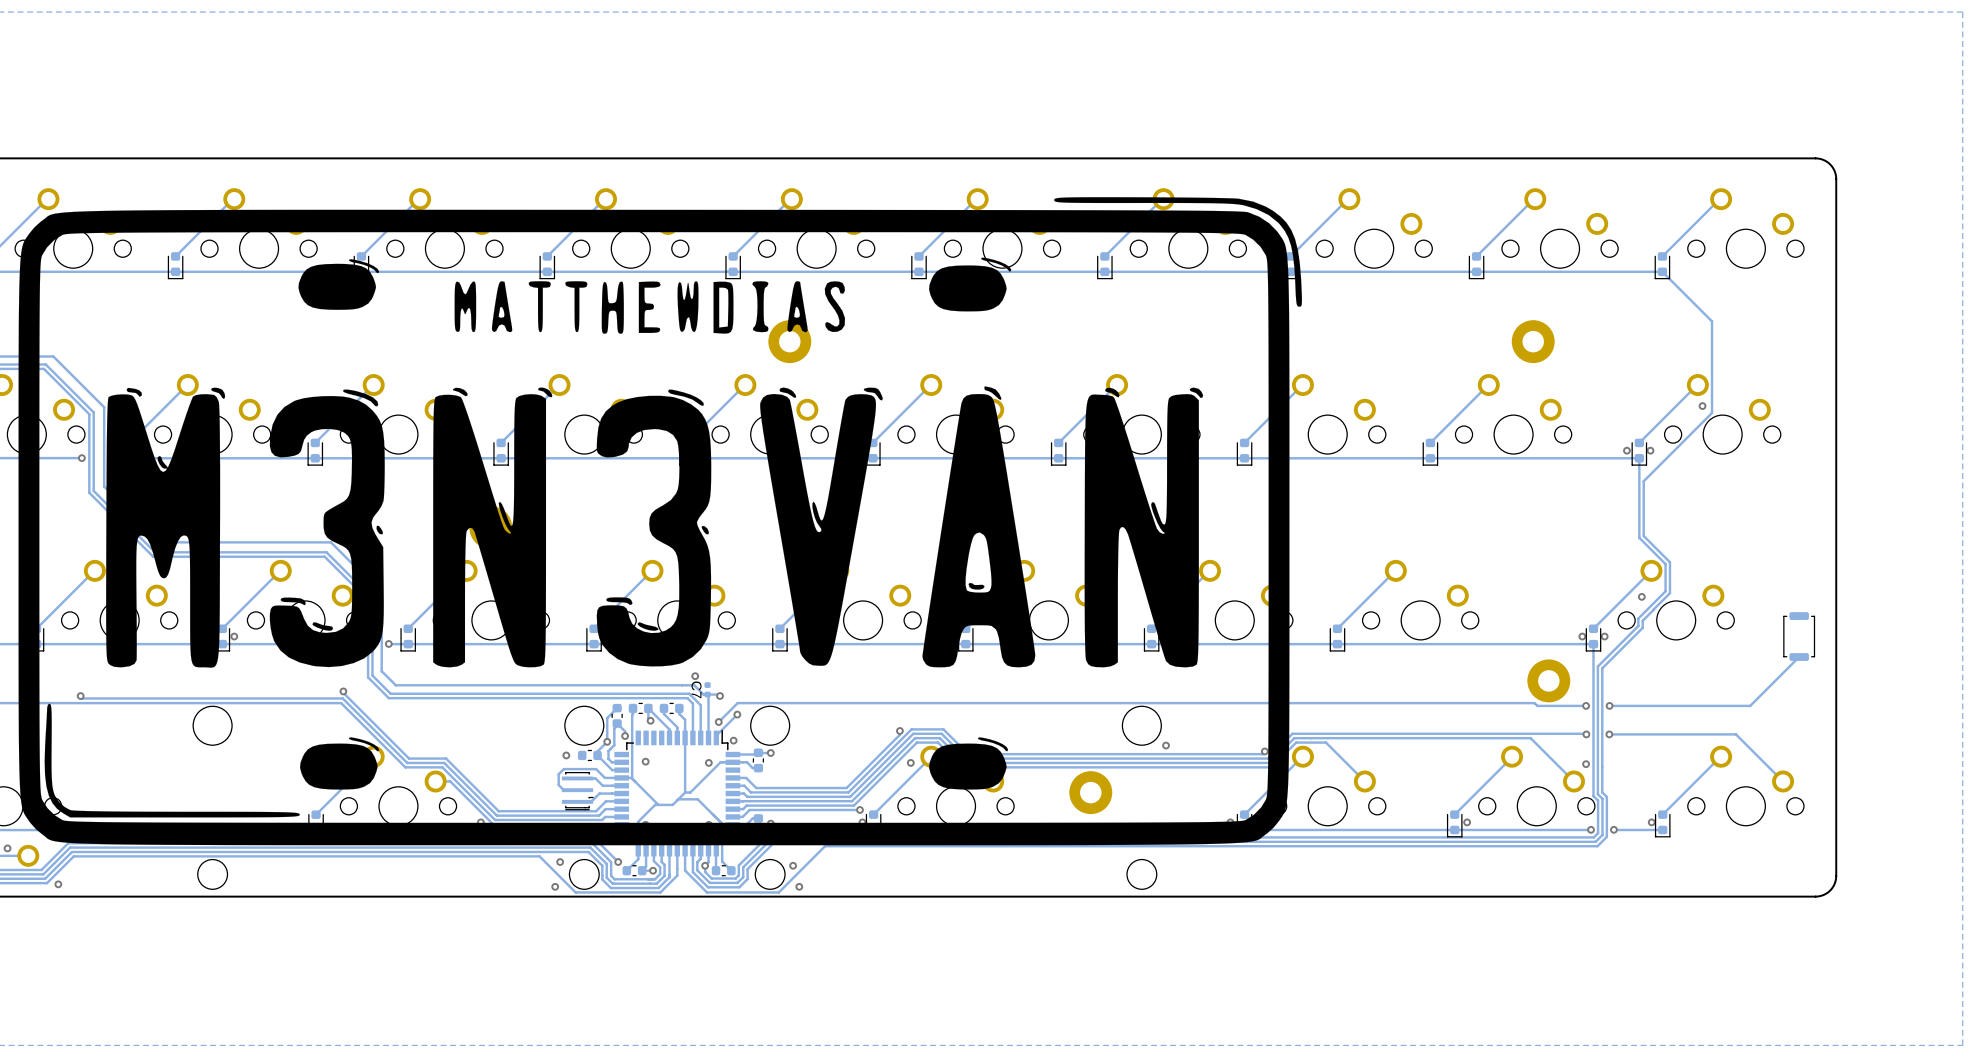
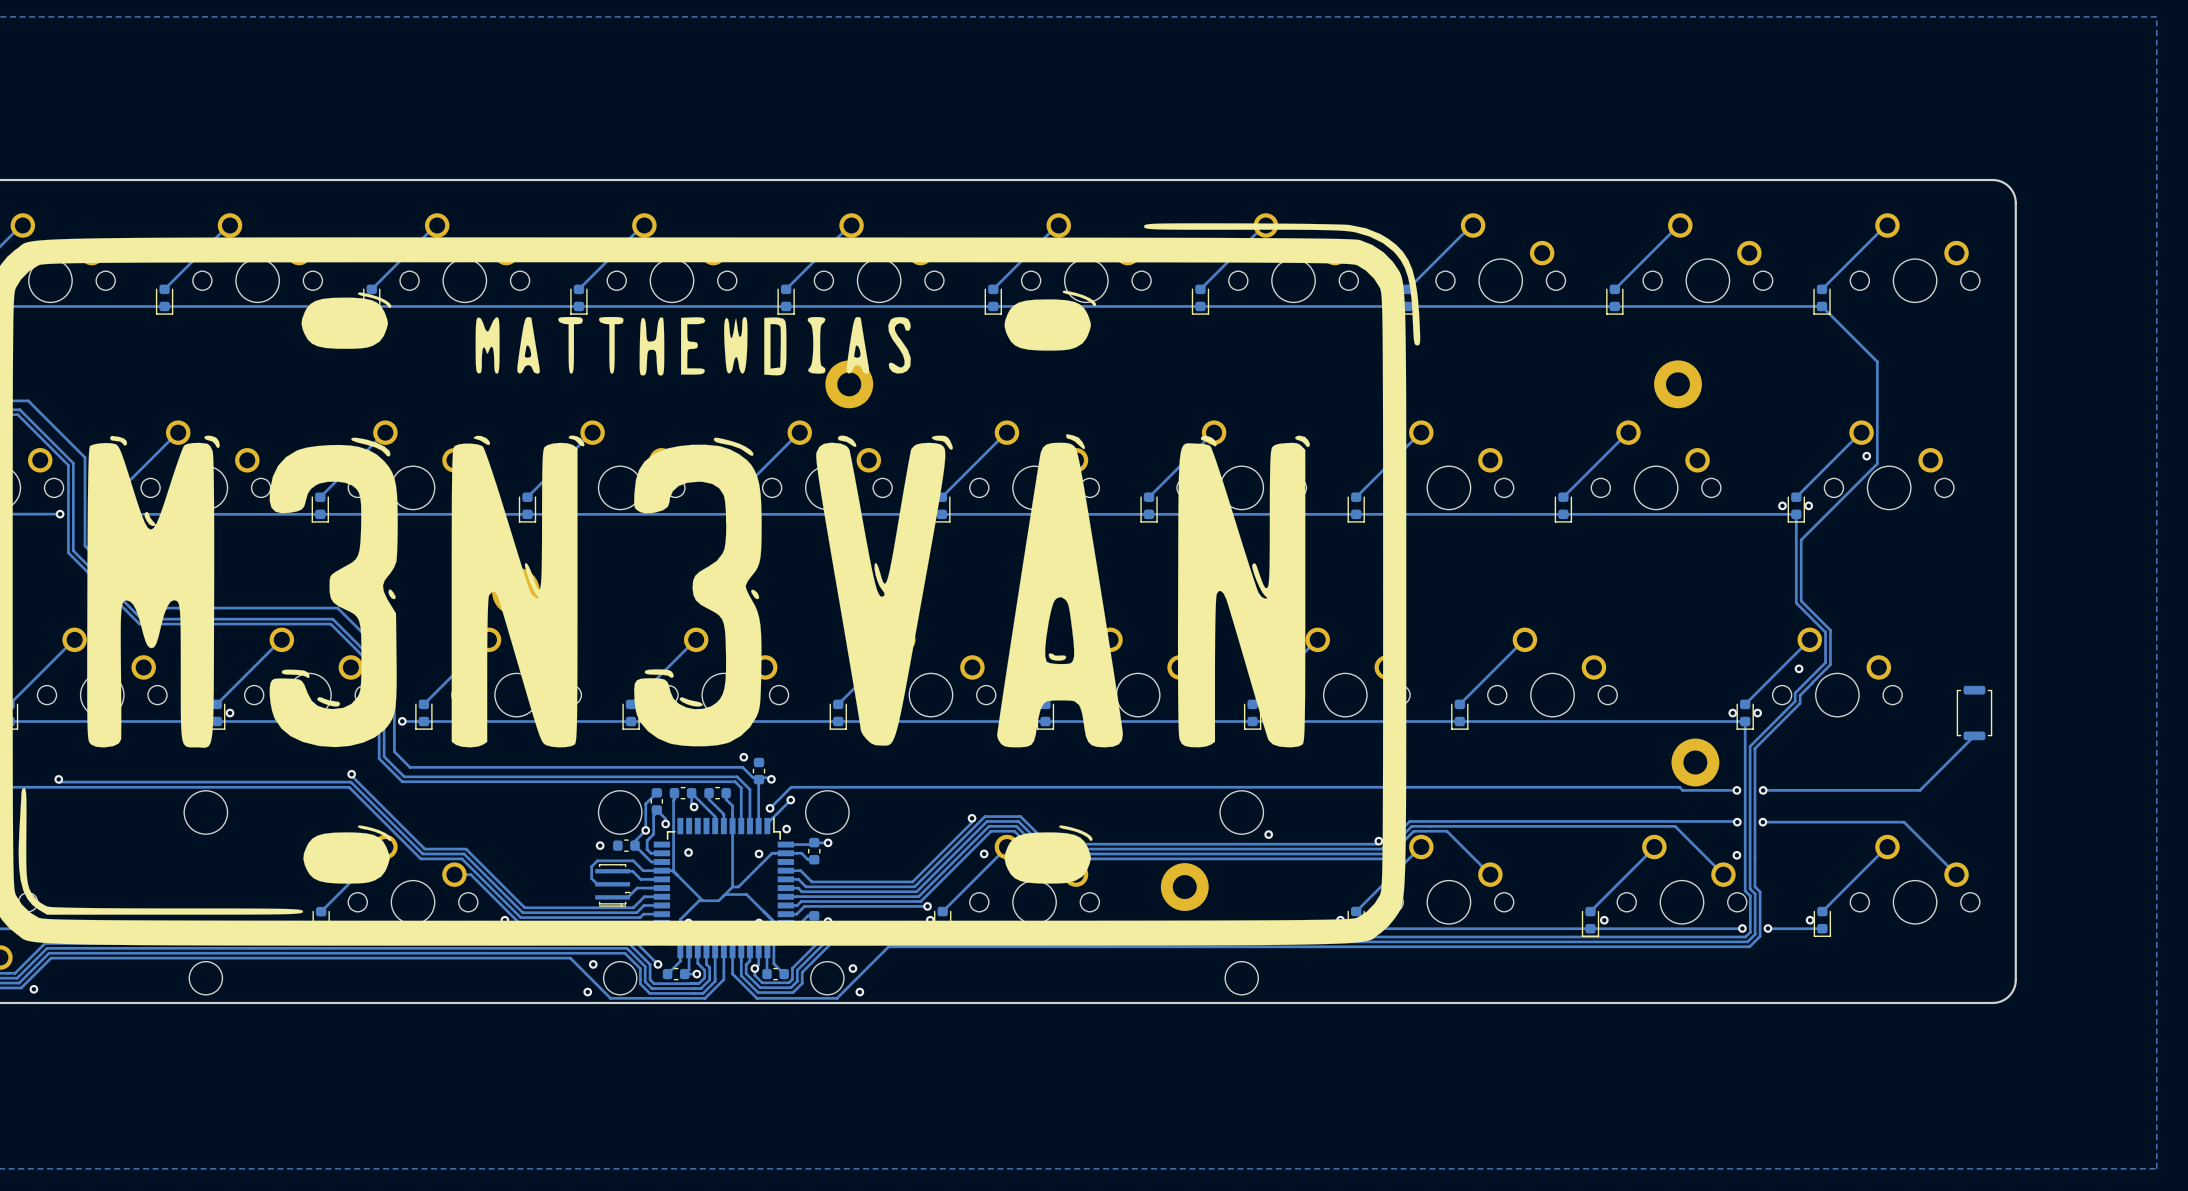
part: none -> (759, 771)
C7: (707, 689) -> none

